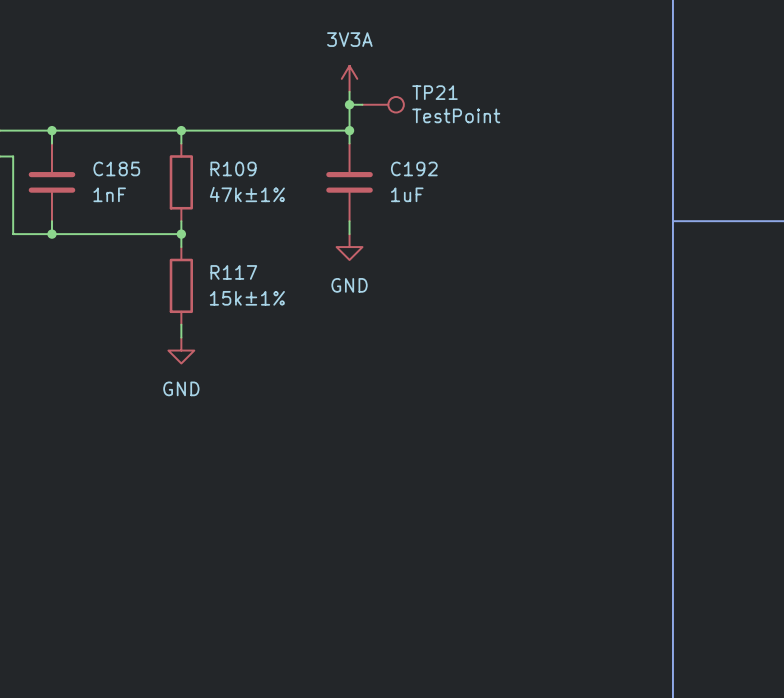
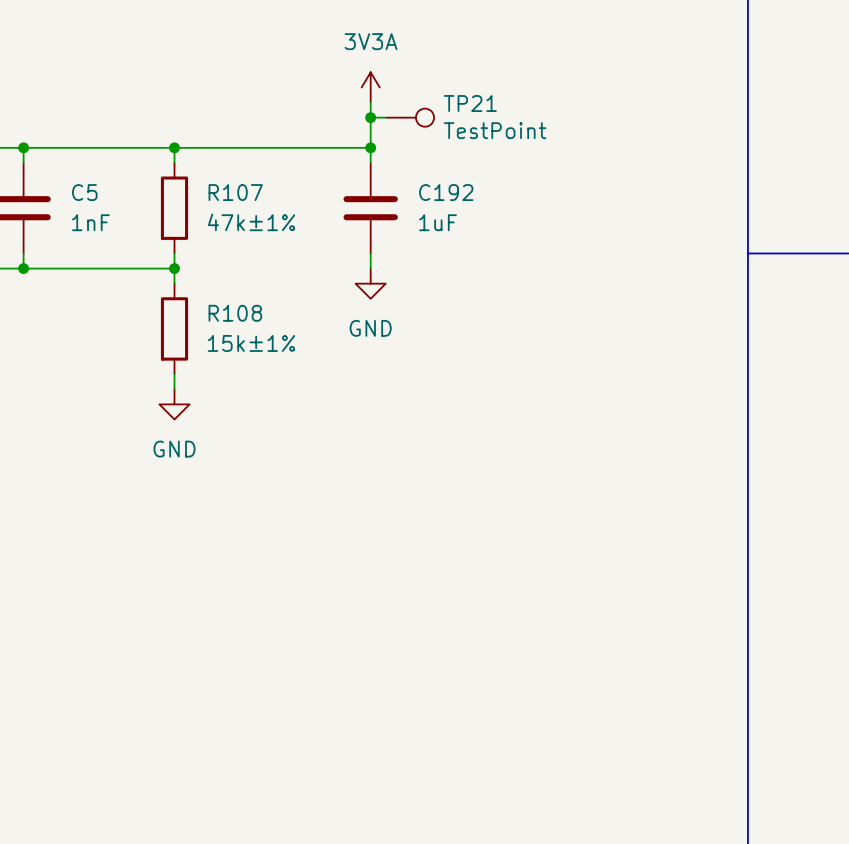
C185 name: C185 (116, 168) -> C5 (84, 192)
R109 name: R109 (233, 168) -> R107 (235, 192)
R117 name: R117 (233, 272) -> R108 (235, 313)

